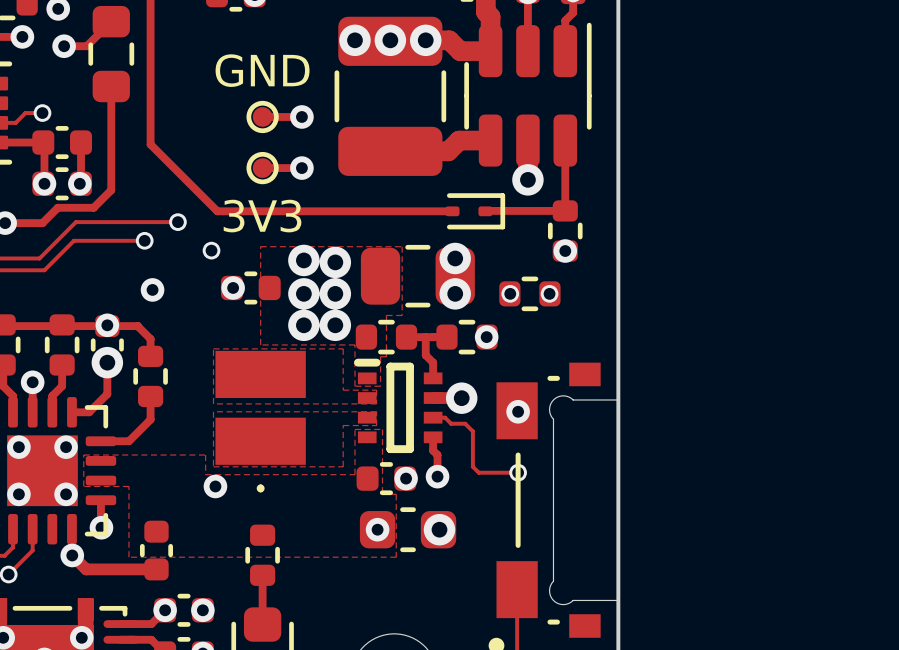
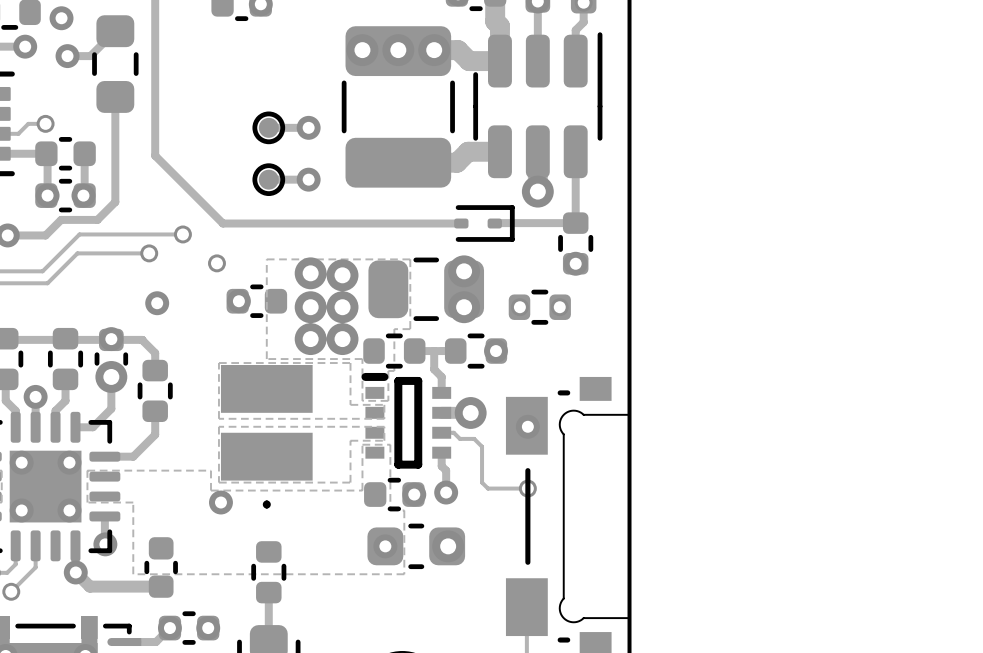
part value: GND (262, 70) -> none
part value: 3V3 (262, 216) -> none

